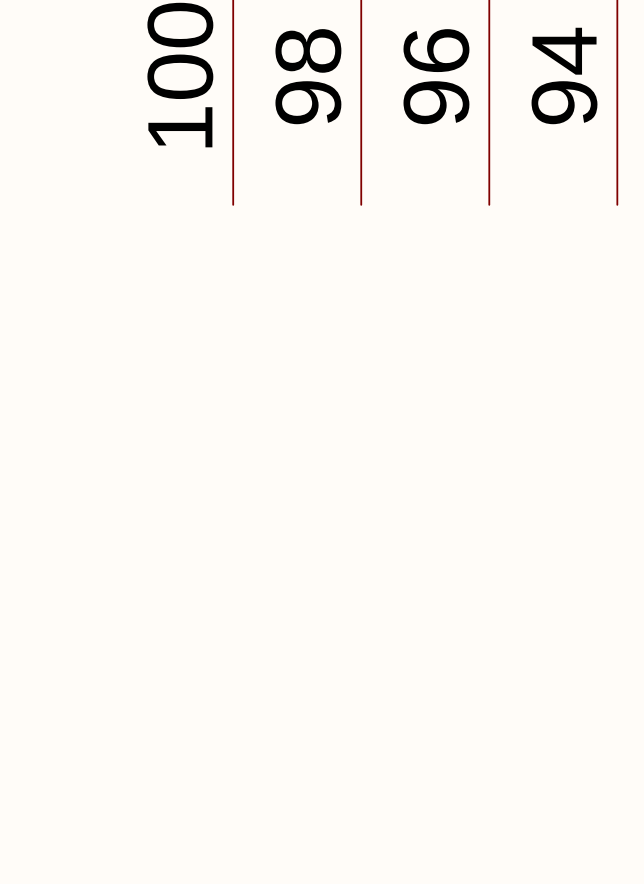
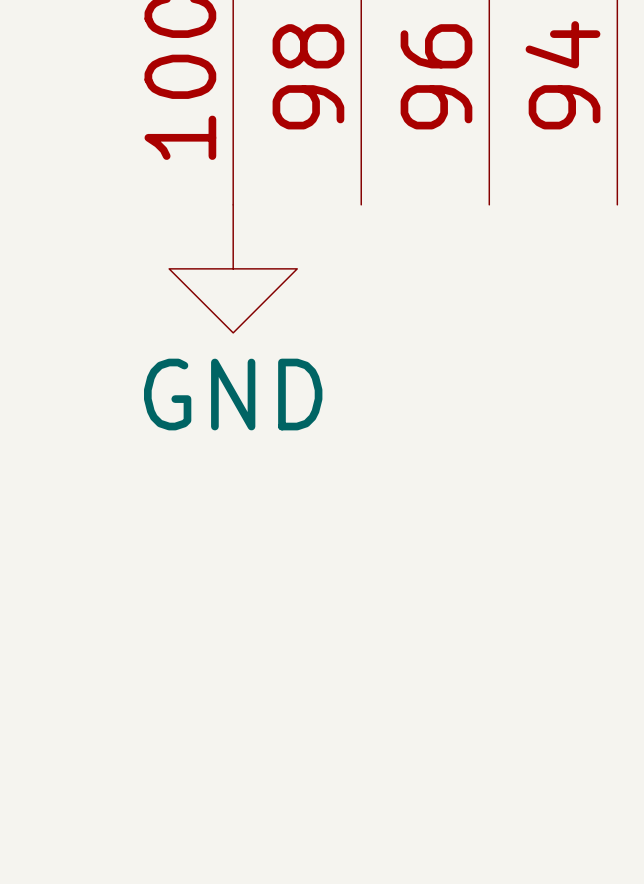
power symbol: none -> GND (233, 268)

